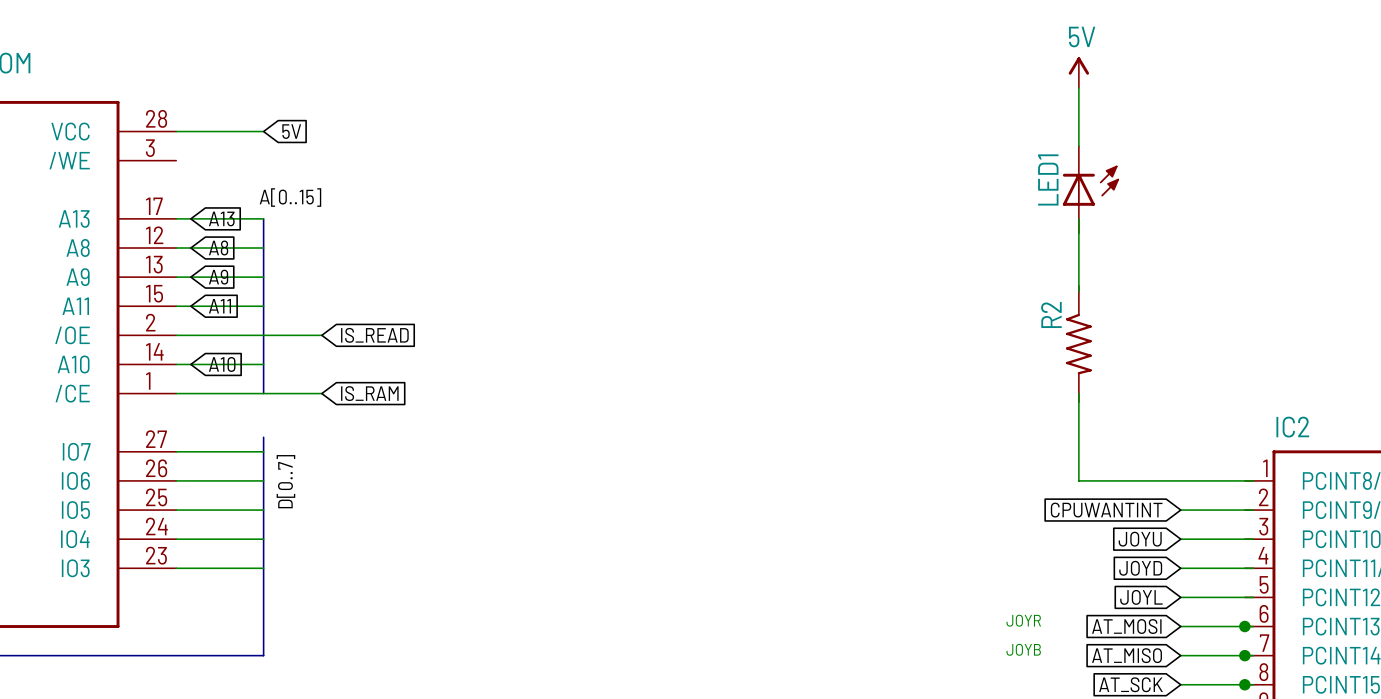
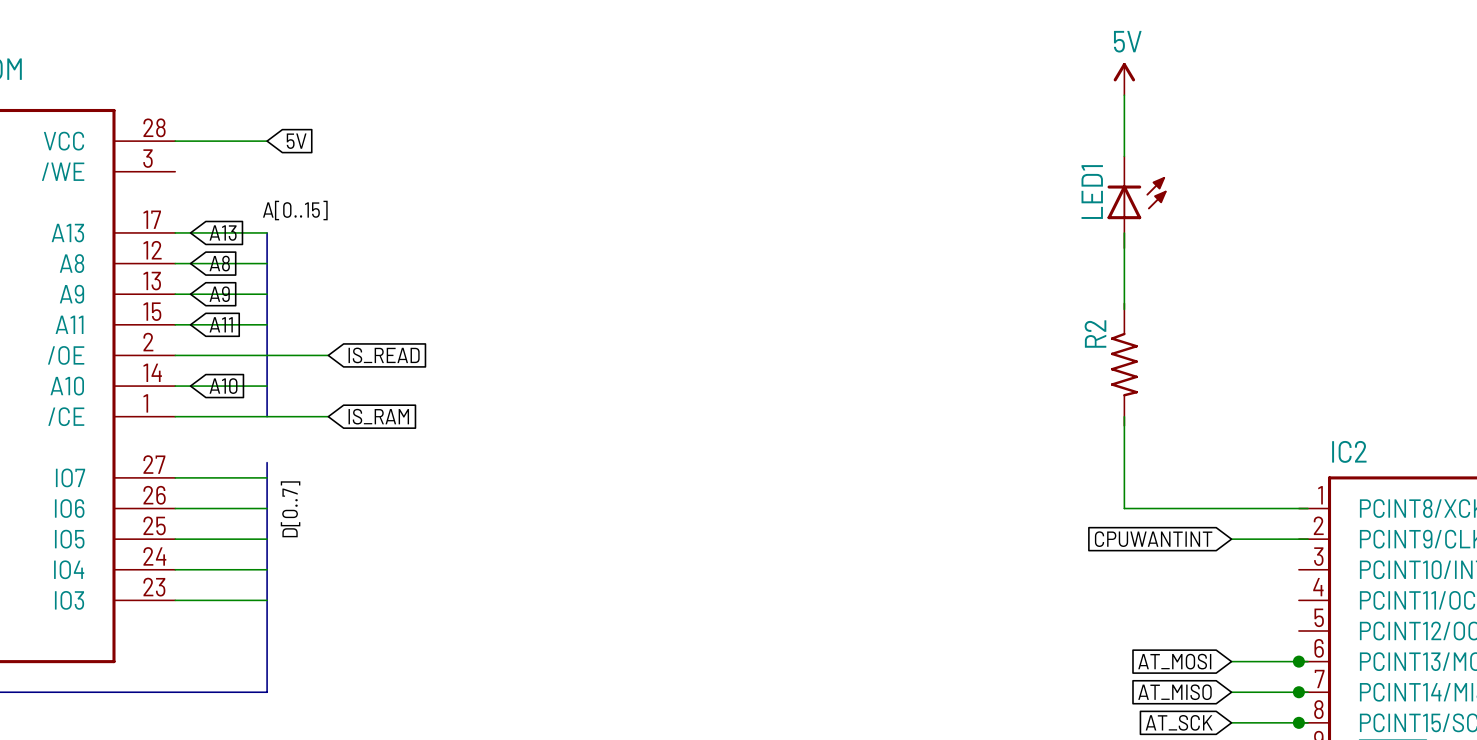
global label: JOYU (1140, 539) -> none
wire: (1180, 539) (1253, 539) -> none
global label: JOYD (1140, 568) -> none
wire: (1180, 568) (1253, 568) -> none
global label: JOYL (1141, 597) -> none
wire: (1180, 597) (1253, 597) -> none
text: JOYR (1023, 620) -> none
text: JOYB (1023, 649) -> none

